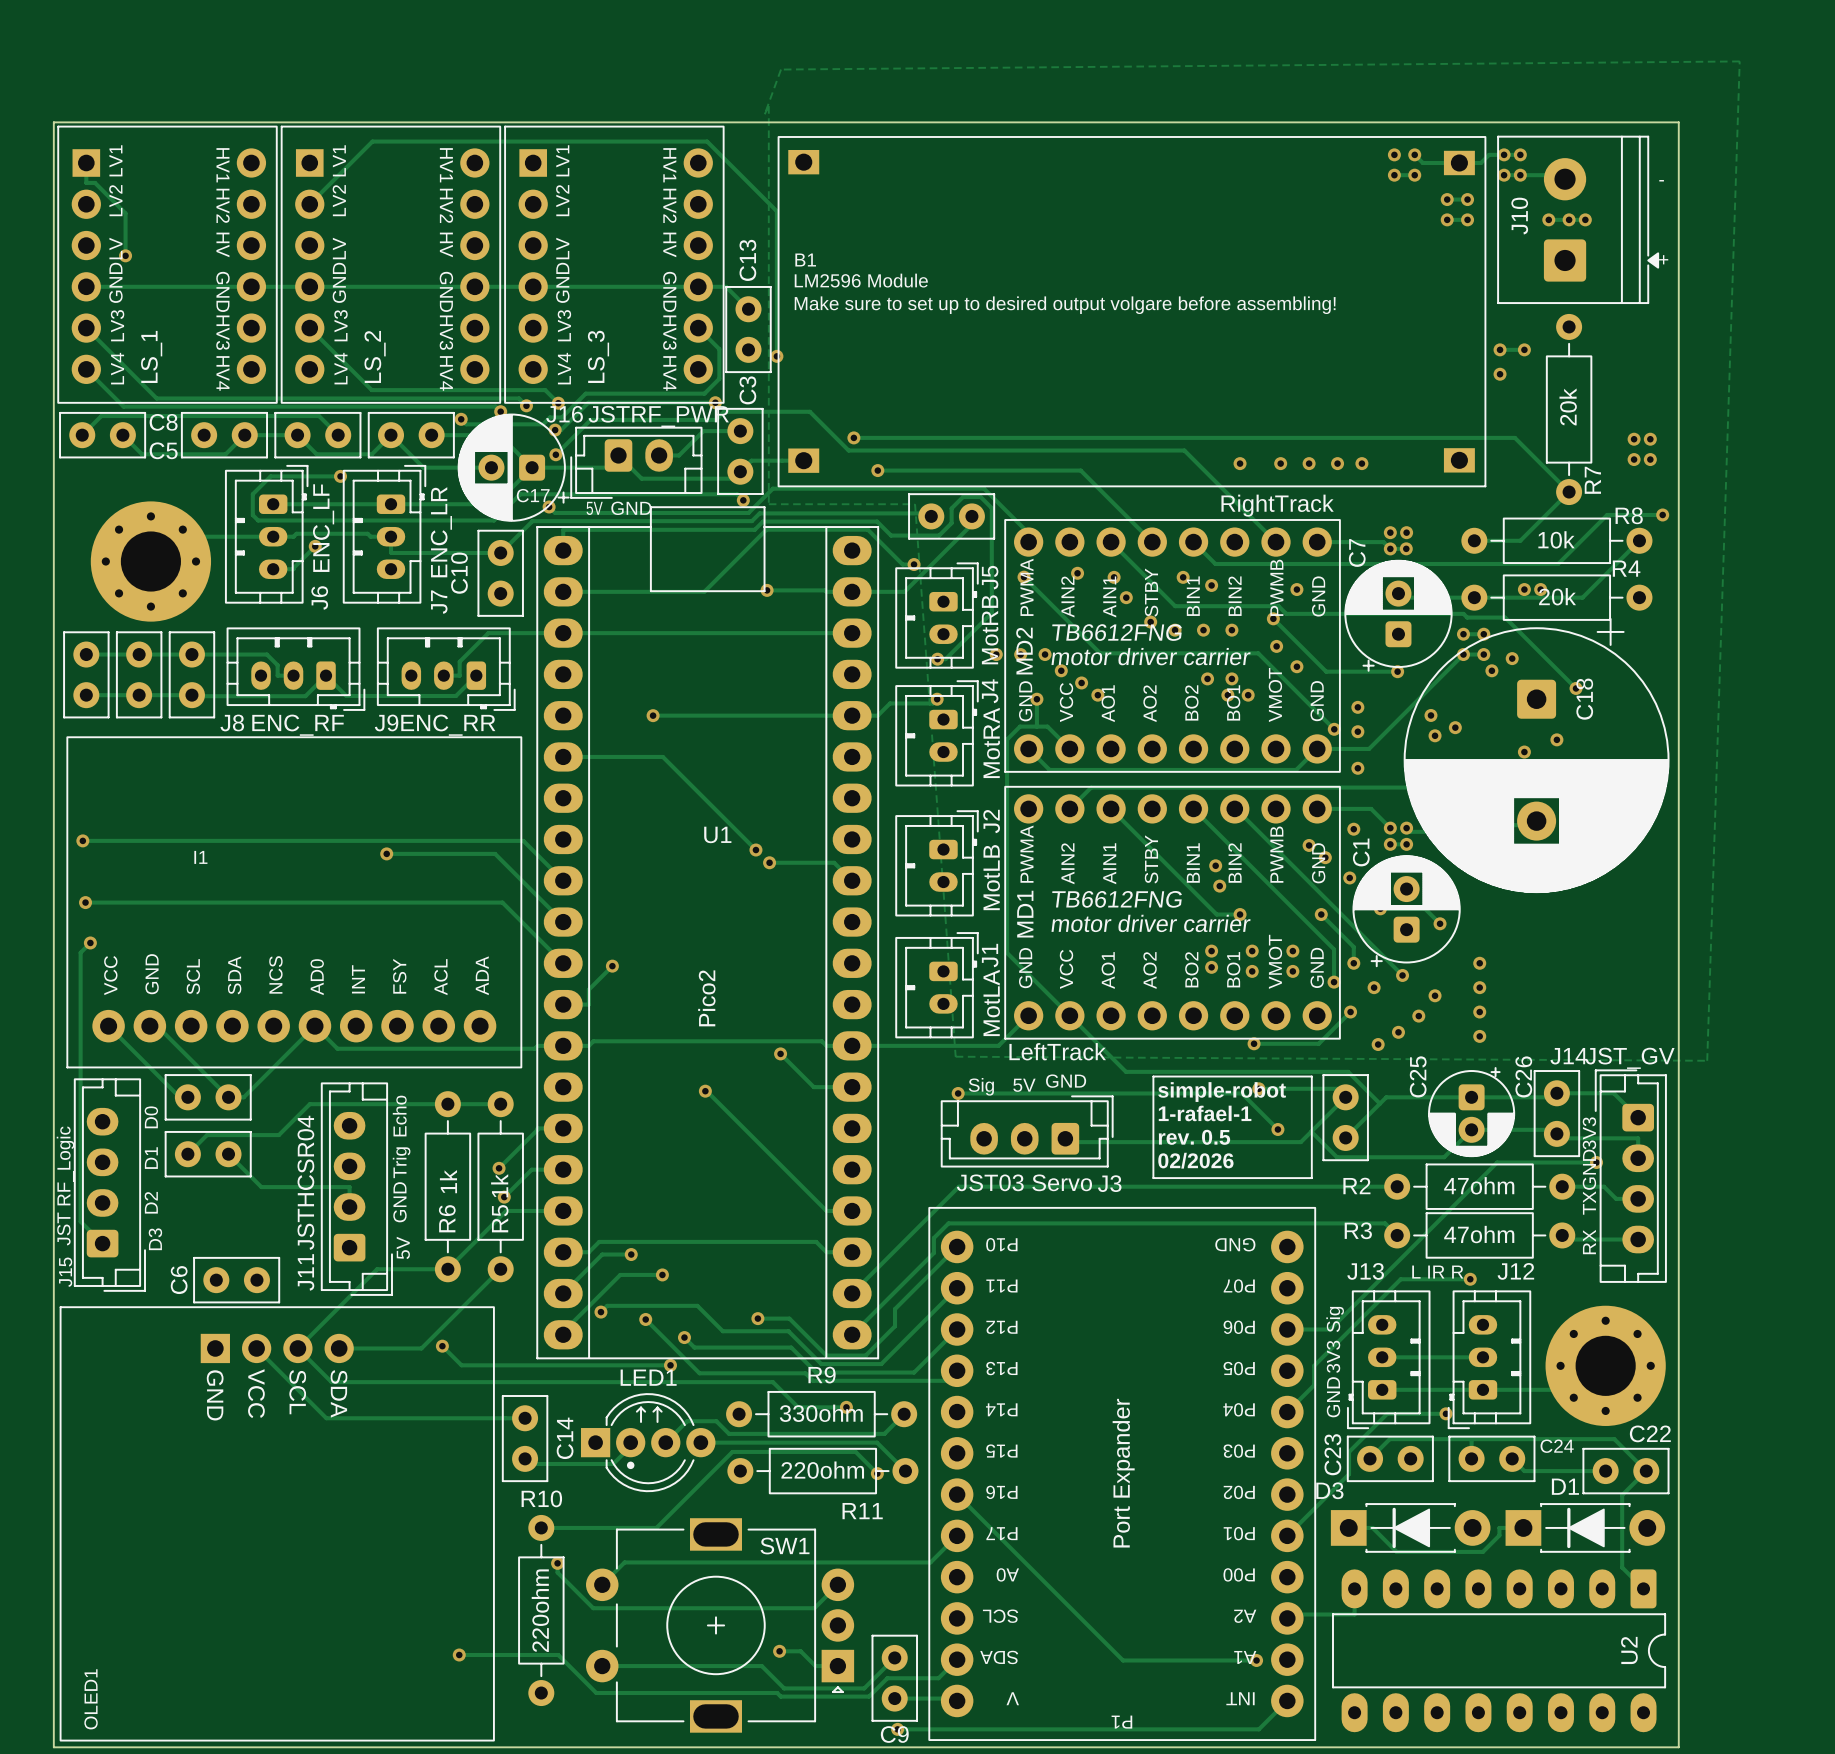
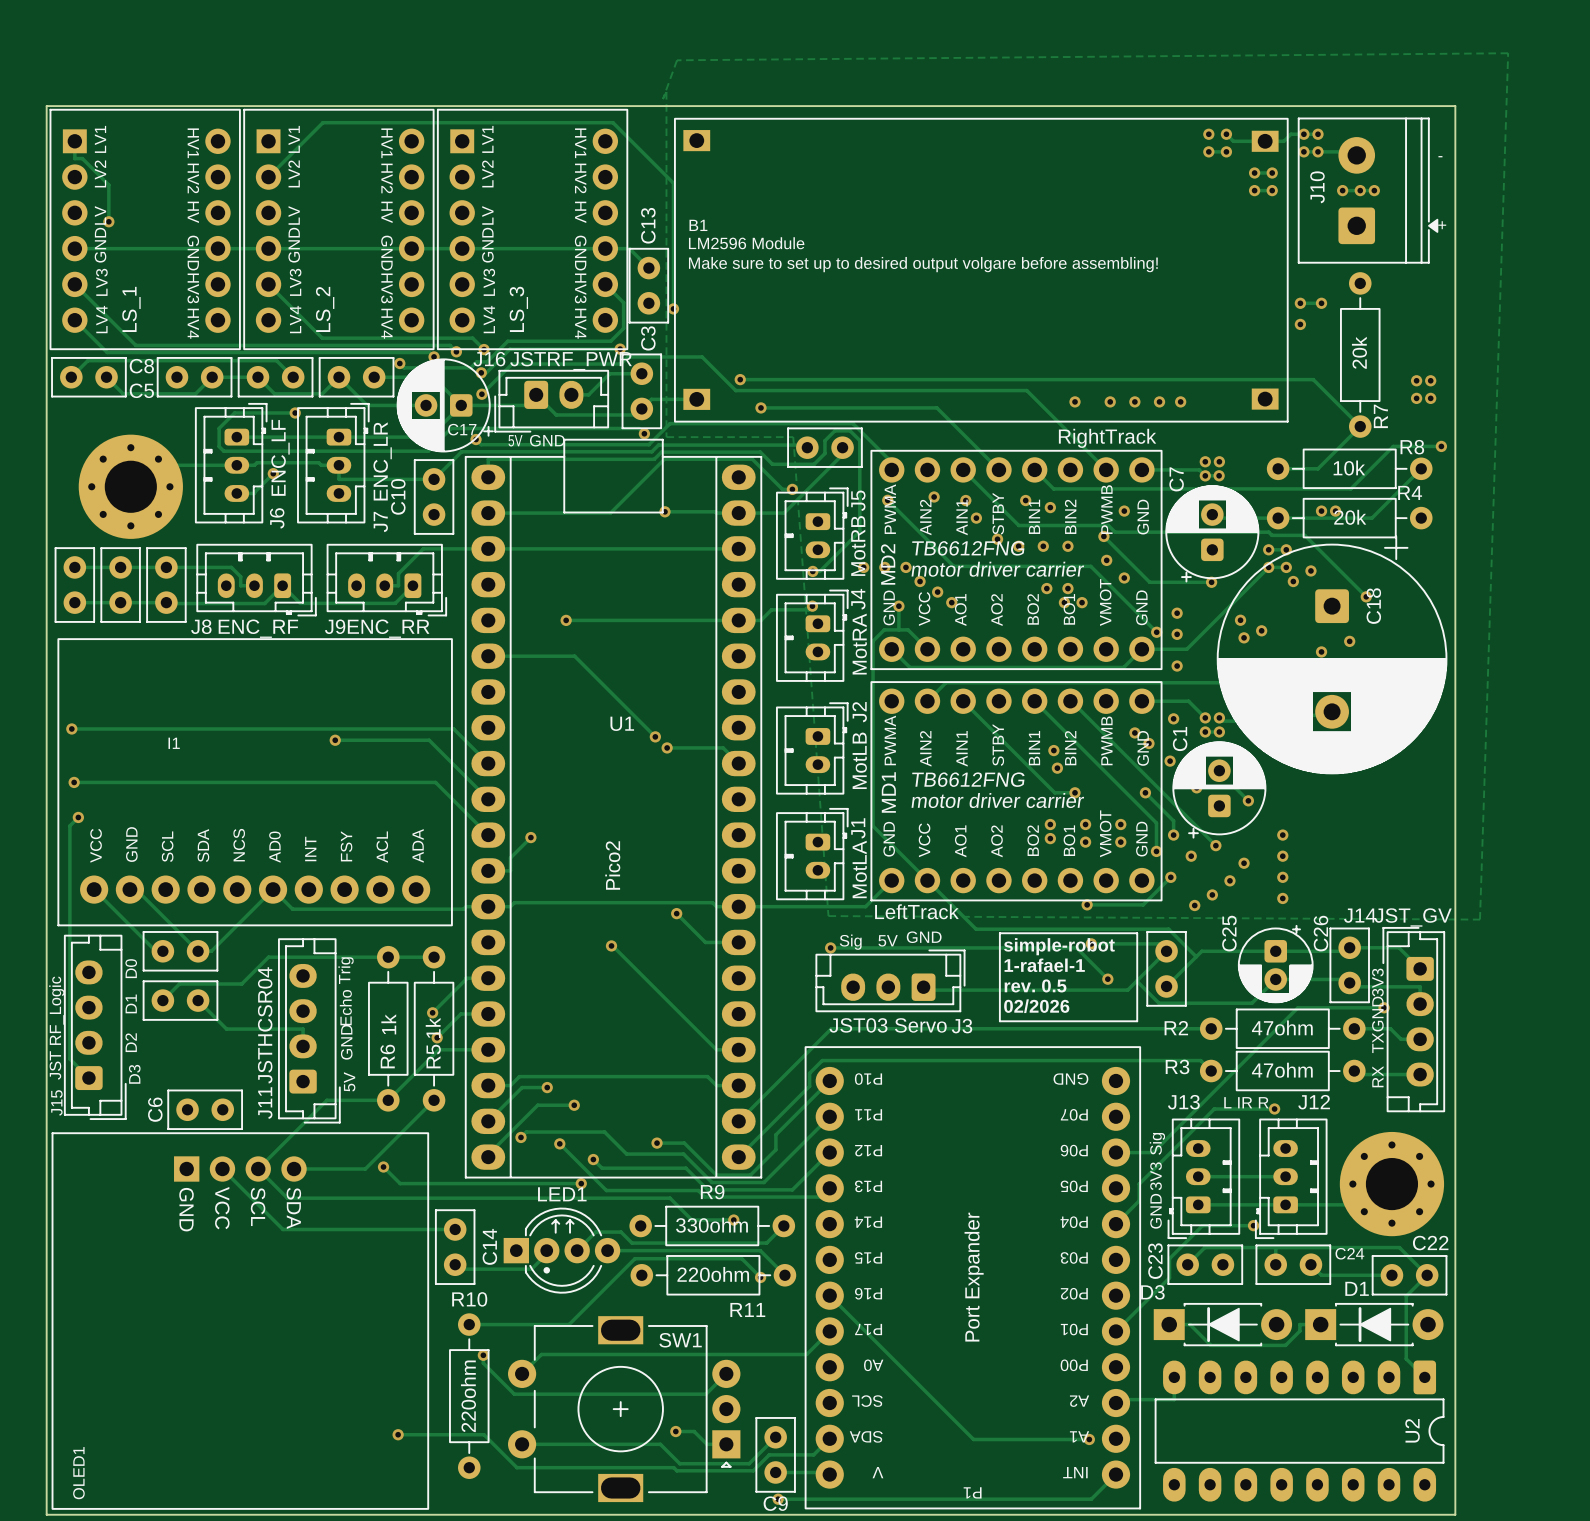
text: Echo (399, 1116) -> Trig (346, 970)
text: Trig (401, 1162) -> Echo (345, 1007)

